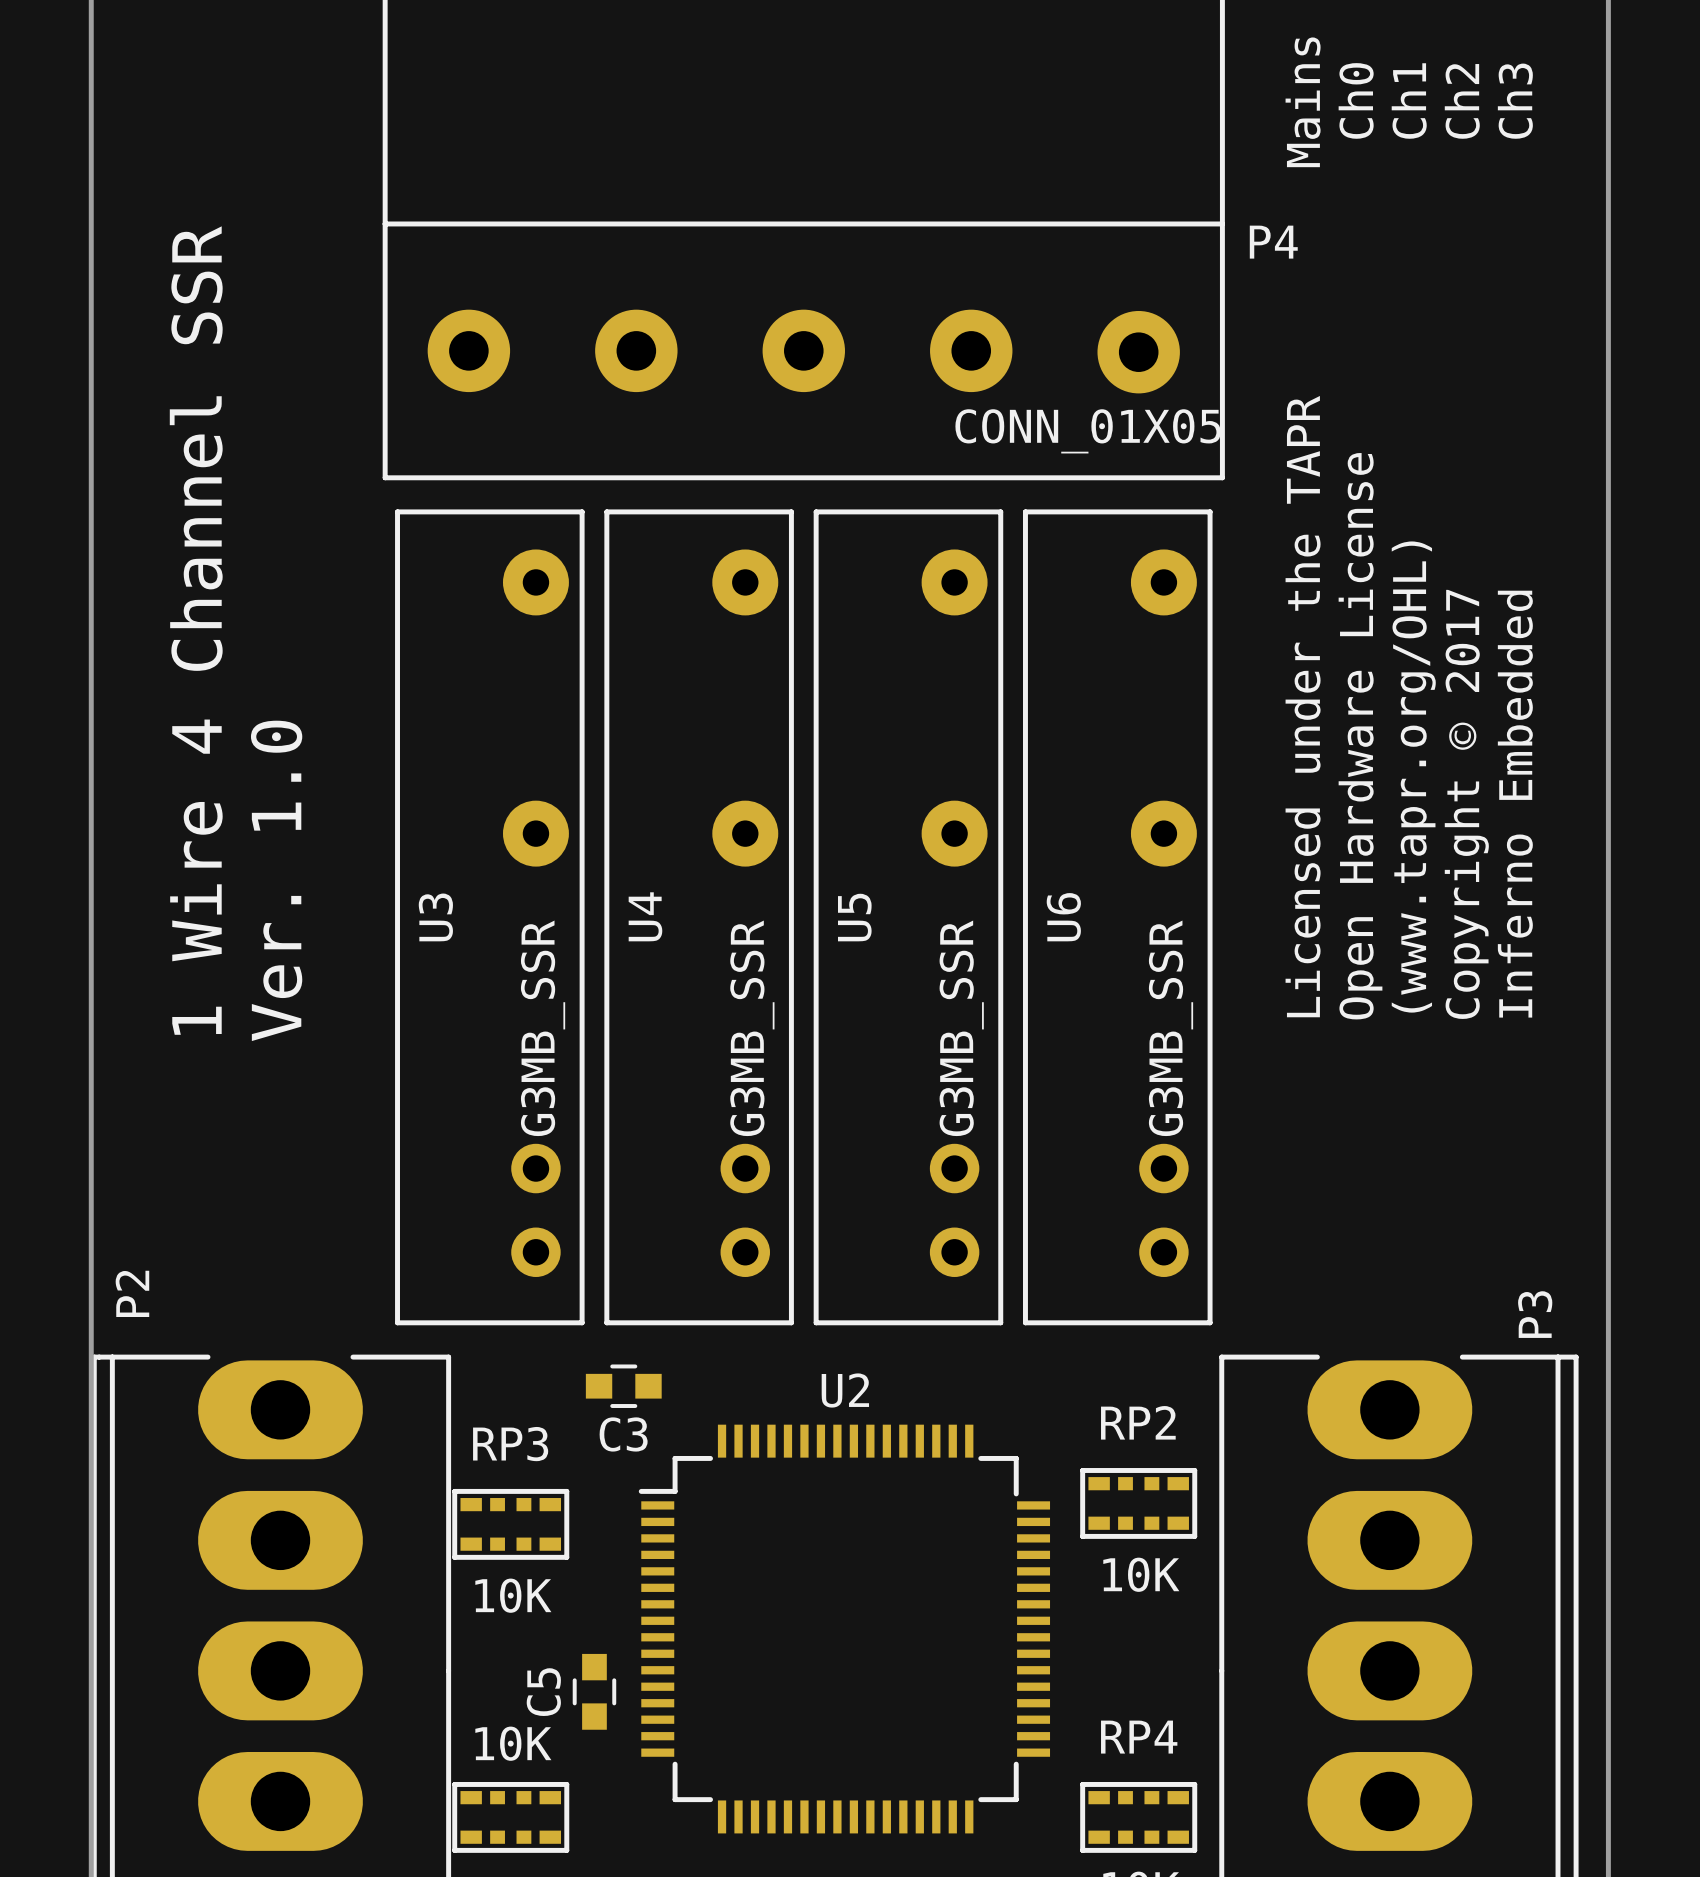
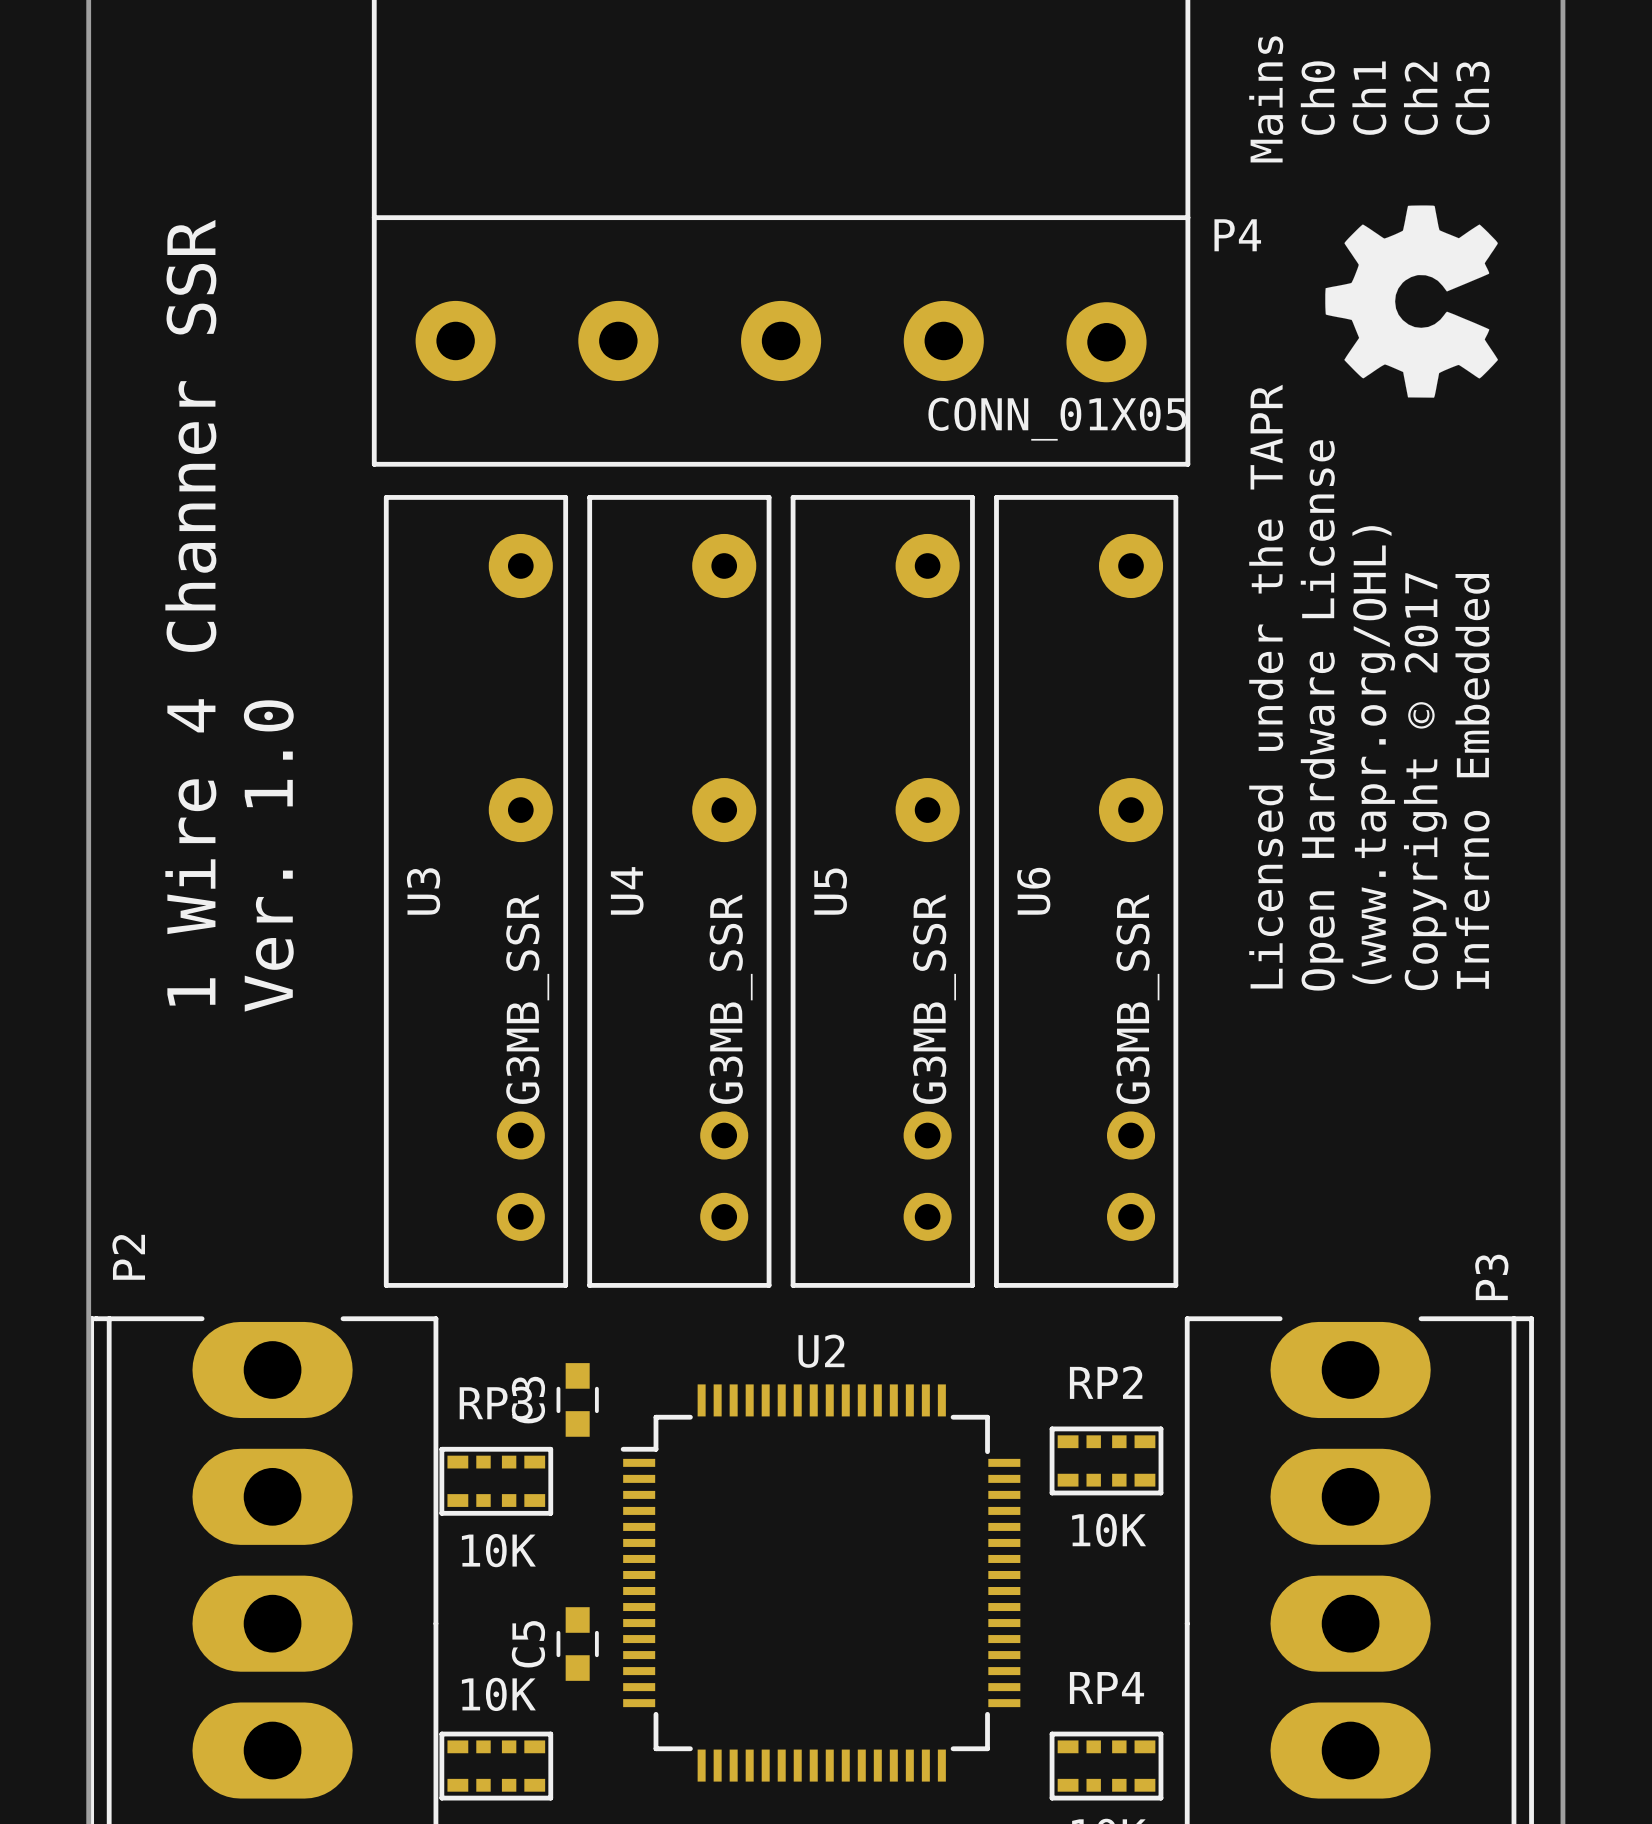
drawing: none -> [1325, 205, 1498, 398]
text: 1 Wire 4 Channel SSR (196, 630) -> 1 Wire 4 Channer SSR (190, 612)
C3 rotation: 0° (623, 1386) -> 90° clockwise (577, 1399)
C3 position: (623, 1386) -> (577, 1399)

